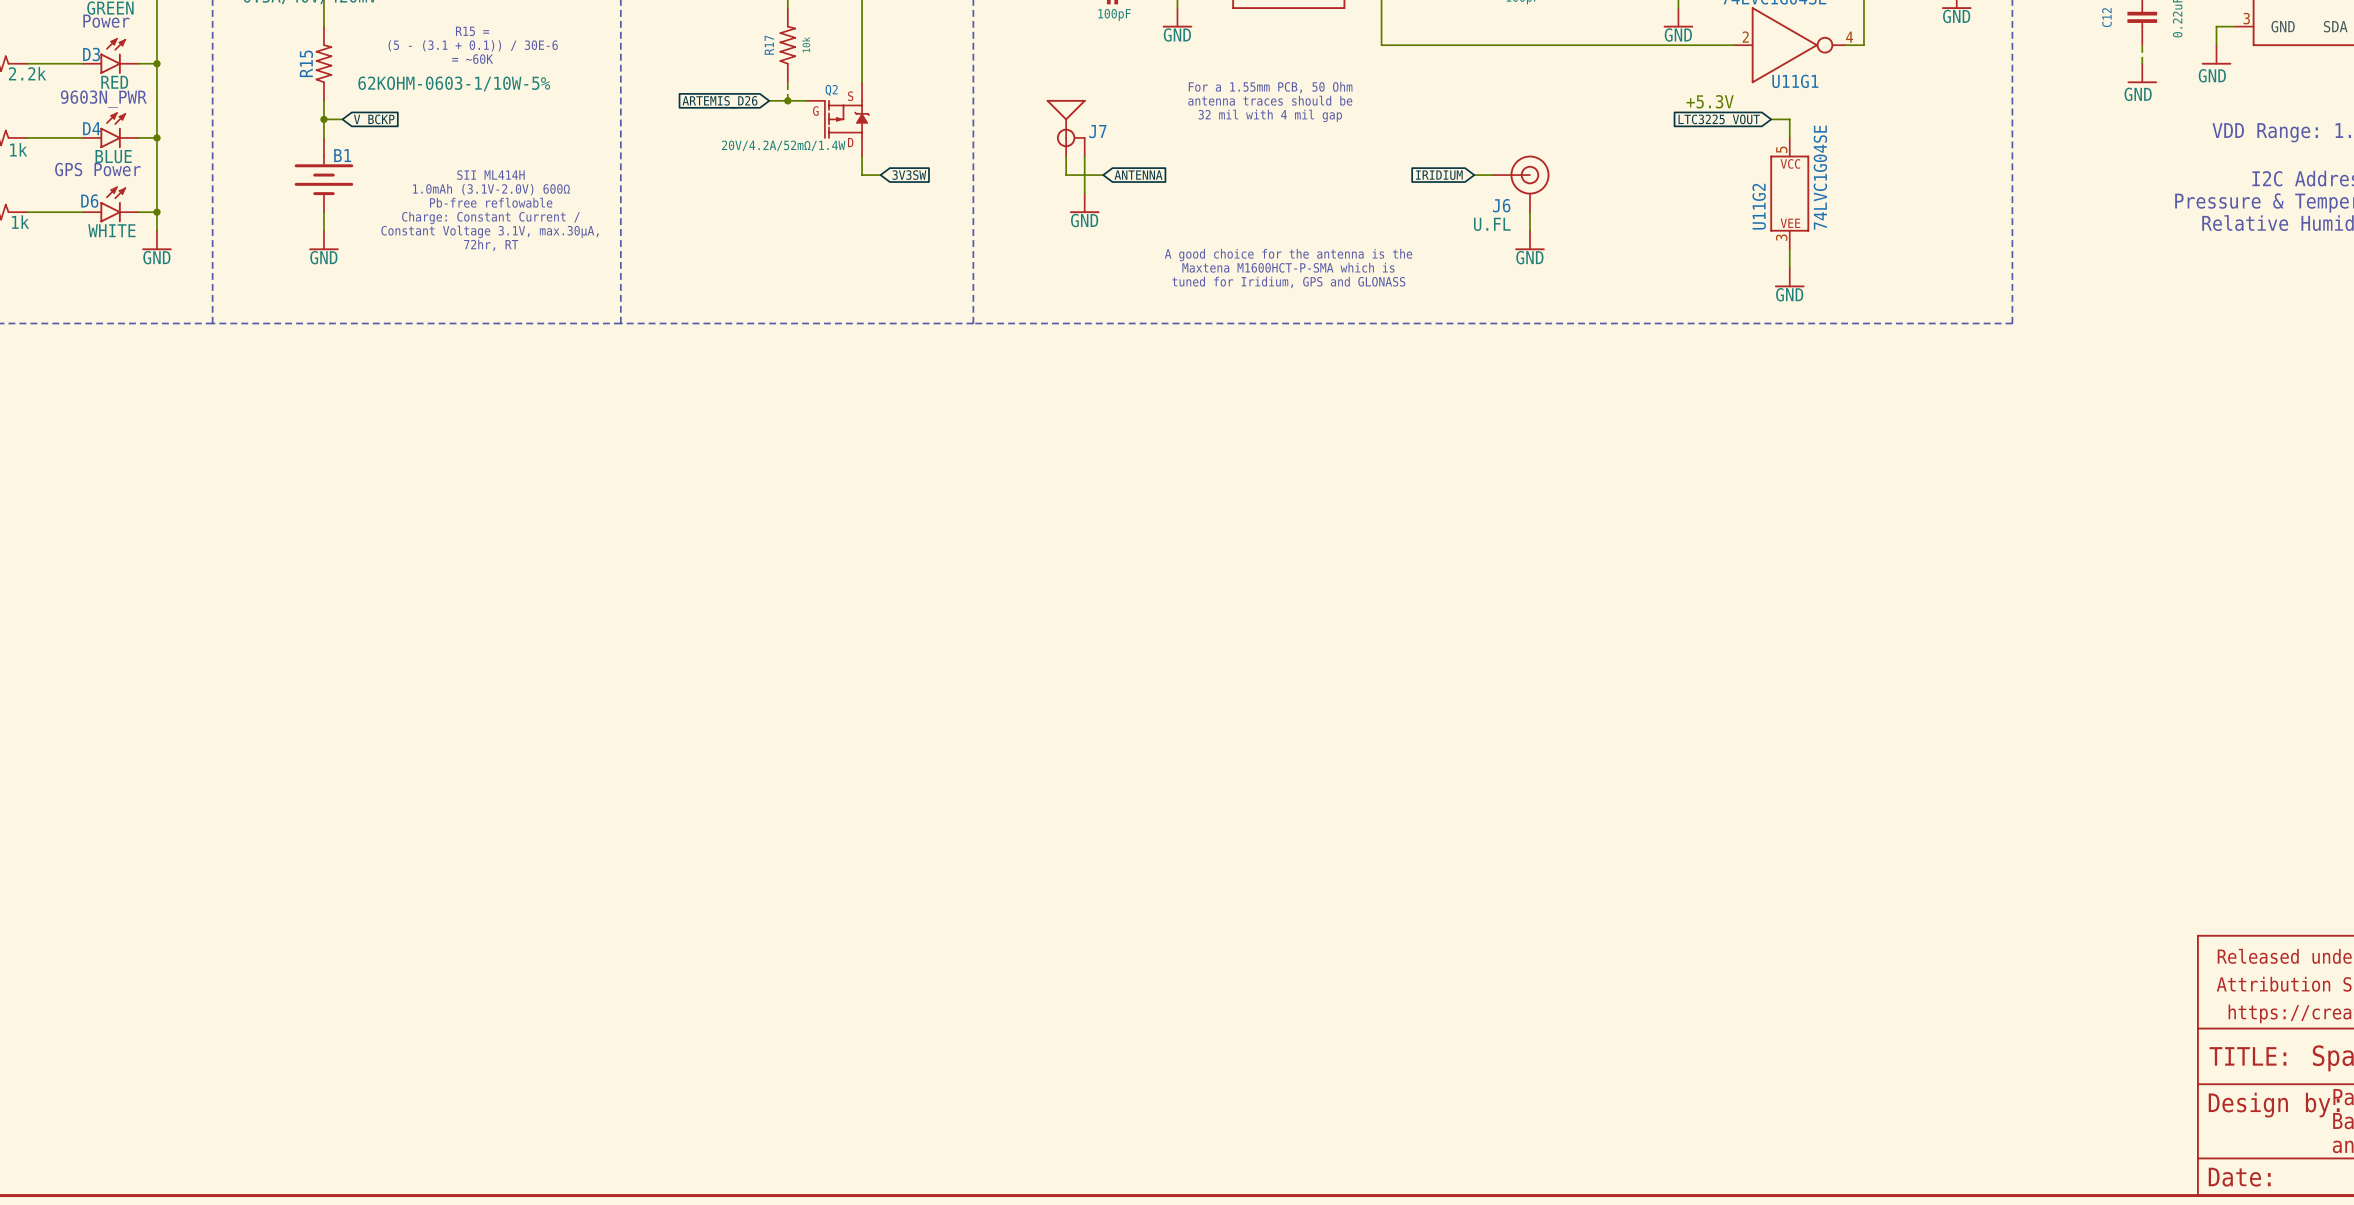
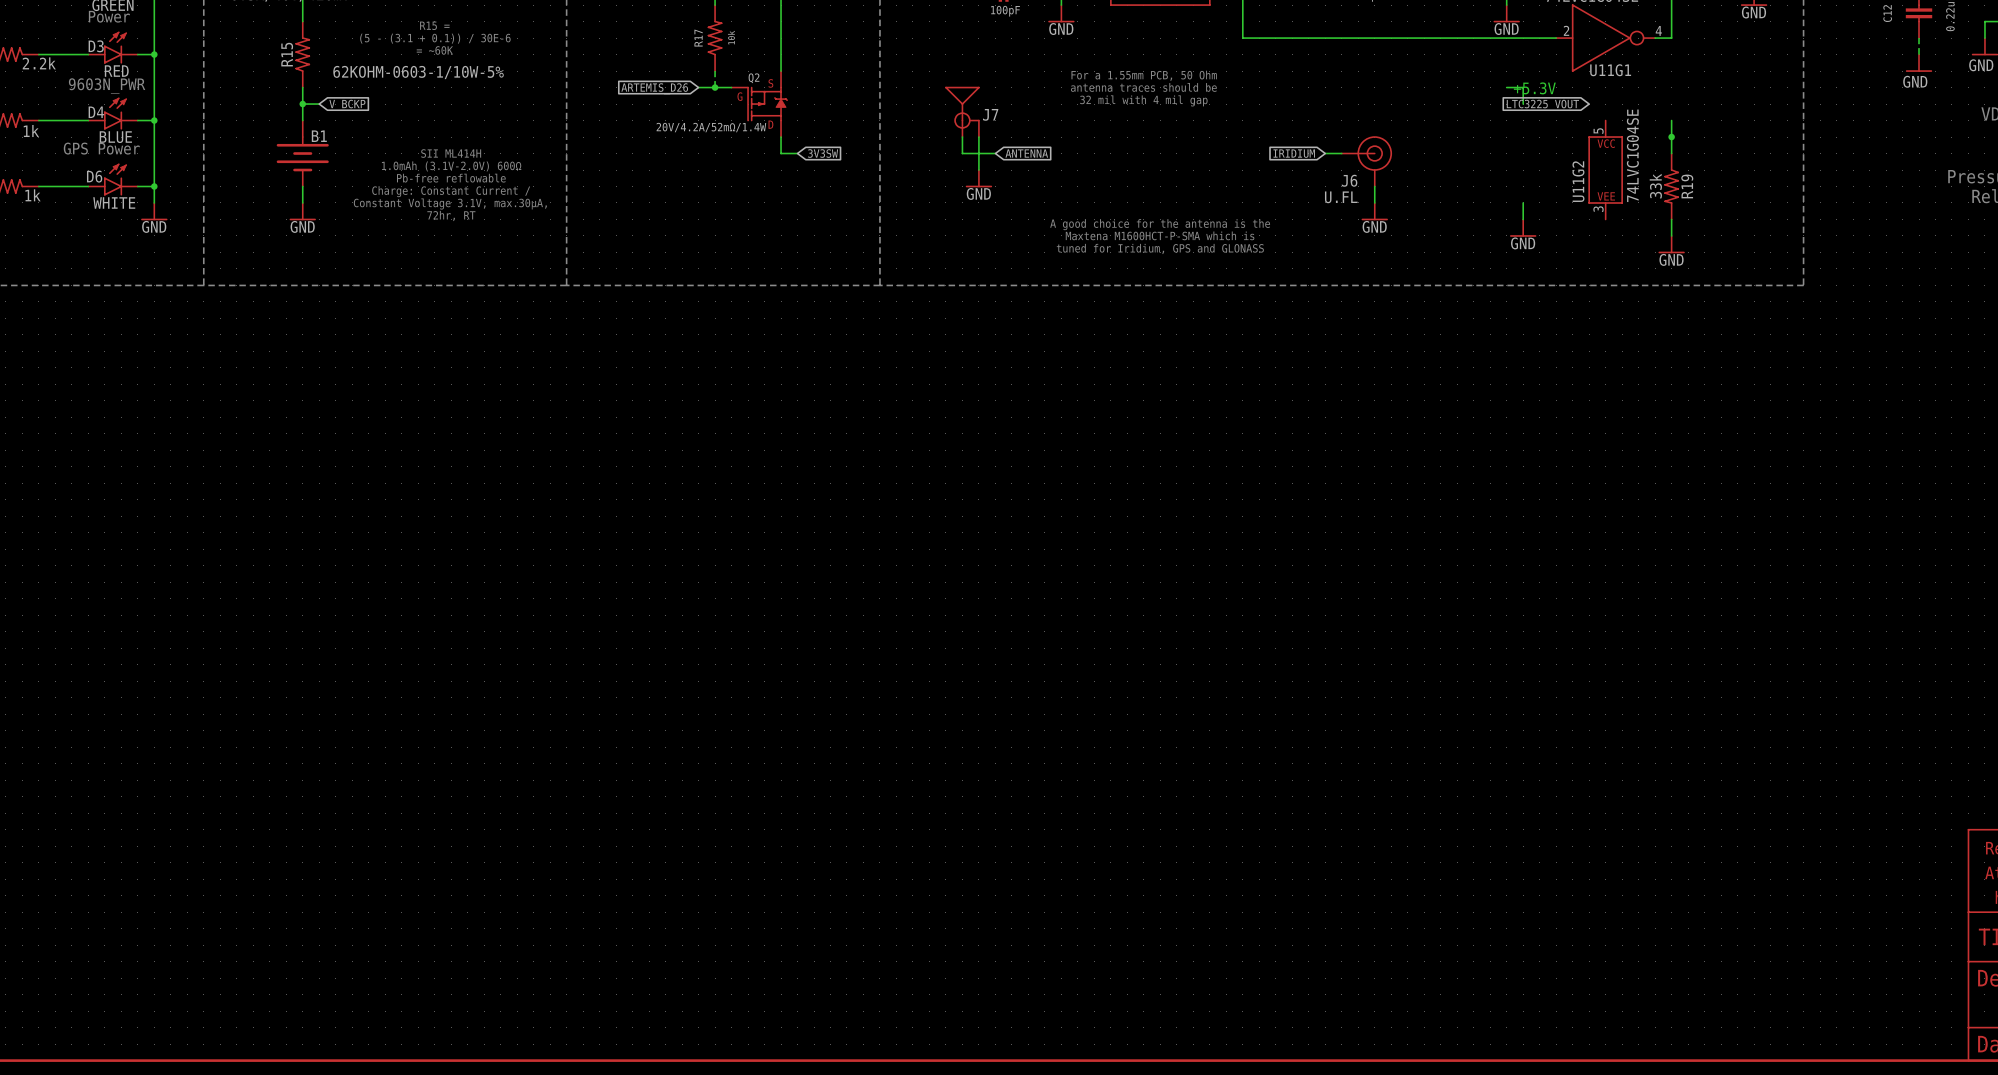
wire: (1771, 119) (1789, 119) (1789, 137) -> (1506, 87) (1523, 87) (1523, 104)
wire: none -> (1671, 120) (1671, 153)
junction: none -> (1671, 137)
R19: none -> 33k (1671, 186)
wire: (1789, 249) (1789, 267) -> (1523, 202) (1523, 219)
wire: none -> (1671, 219) (1671, 235)
power symbol: none -> GND (1523, 228)
power symbol: GND (1789, 277) -> none
power symbol: none -> GND (1671, 244)

